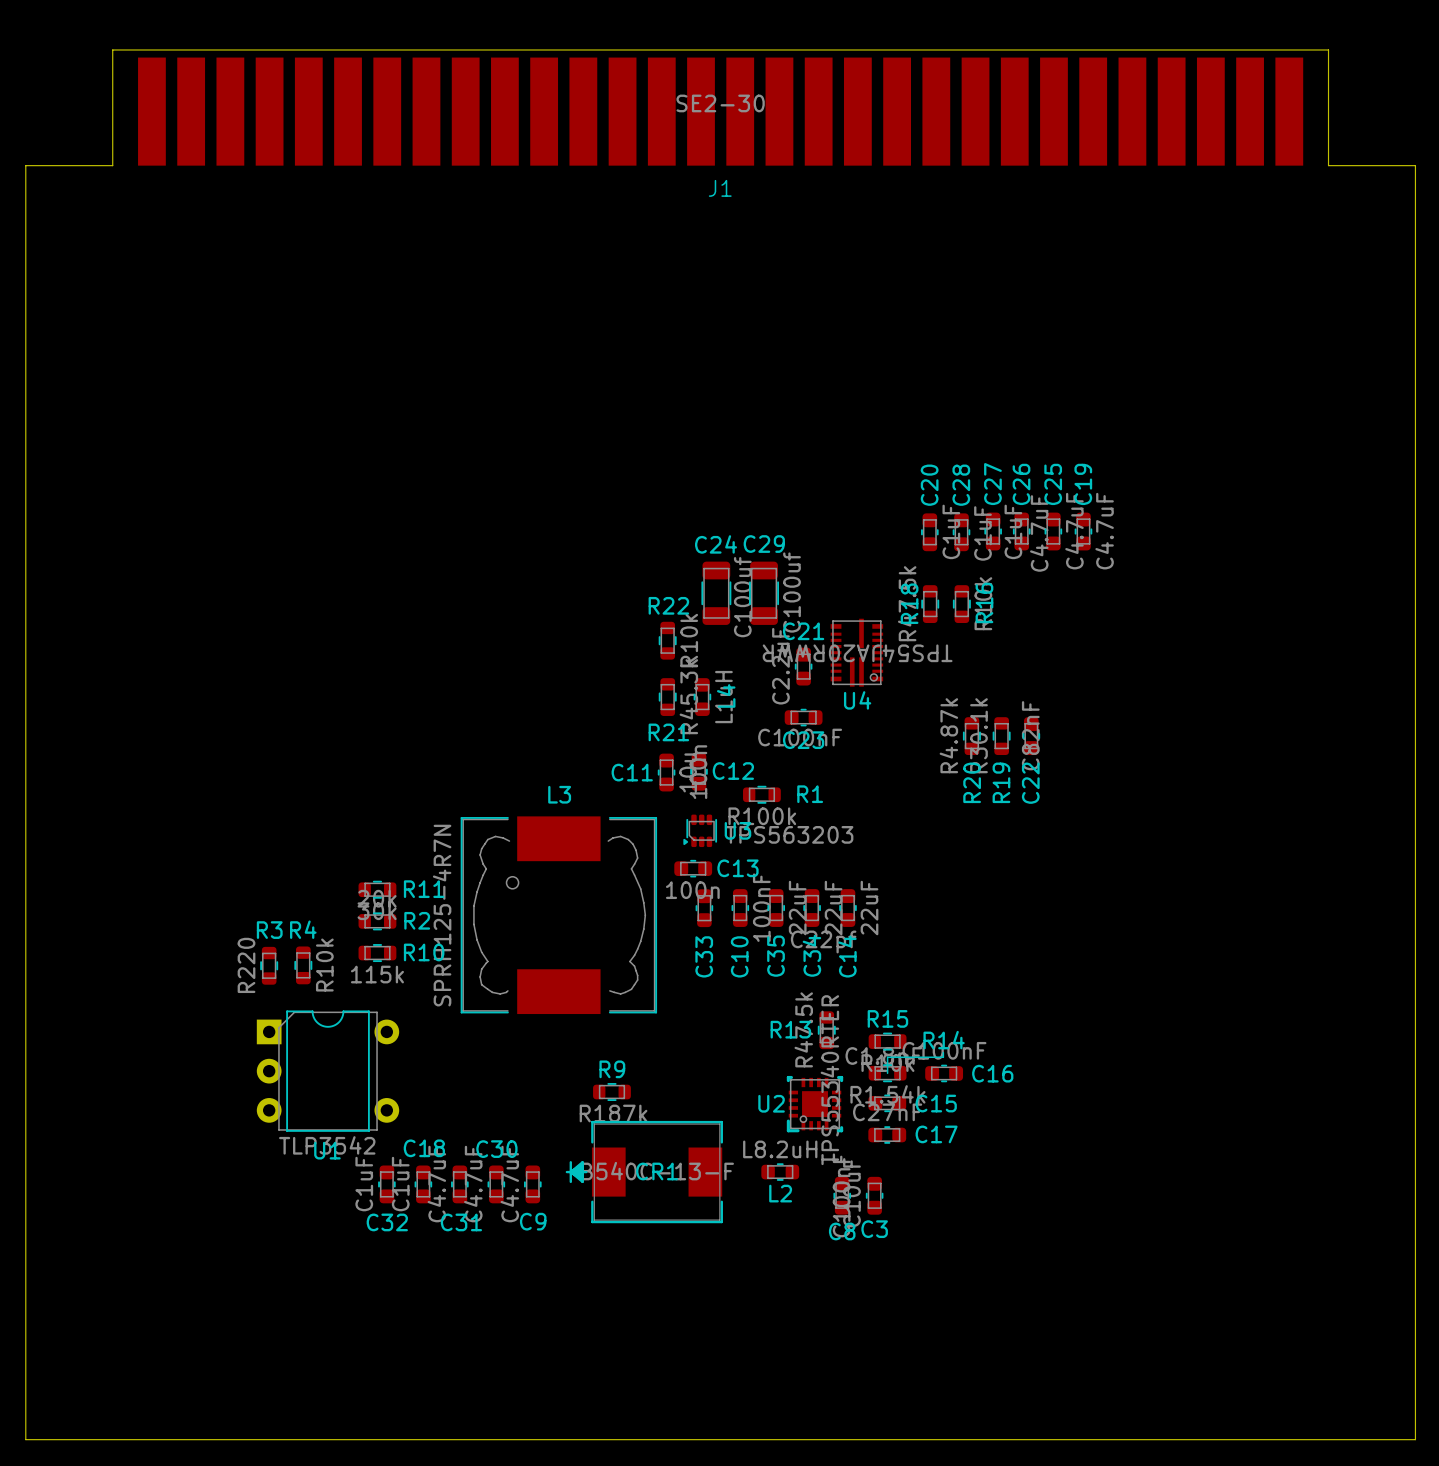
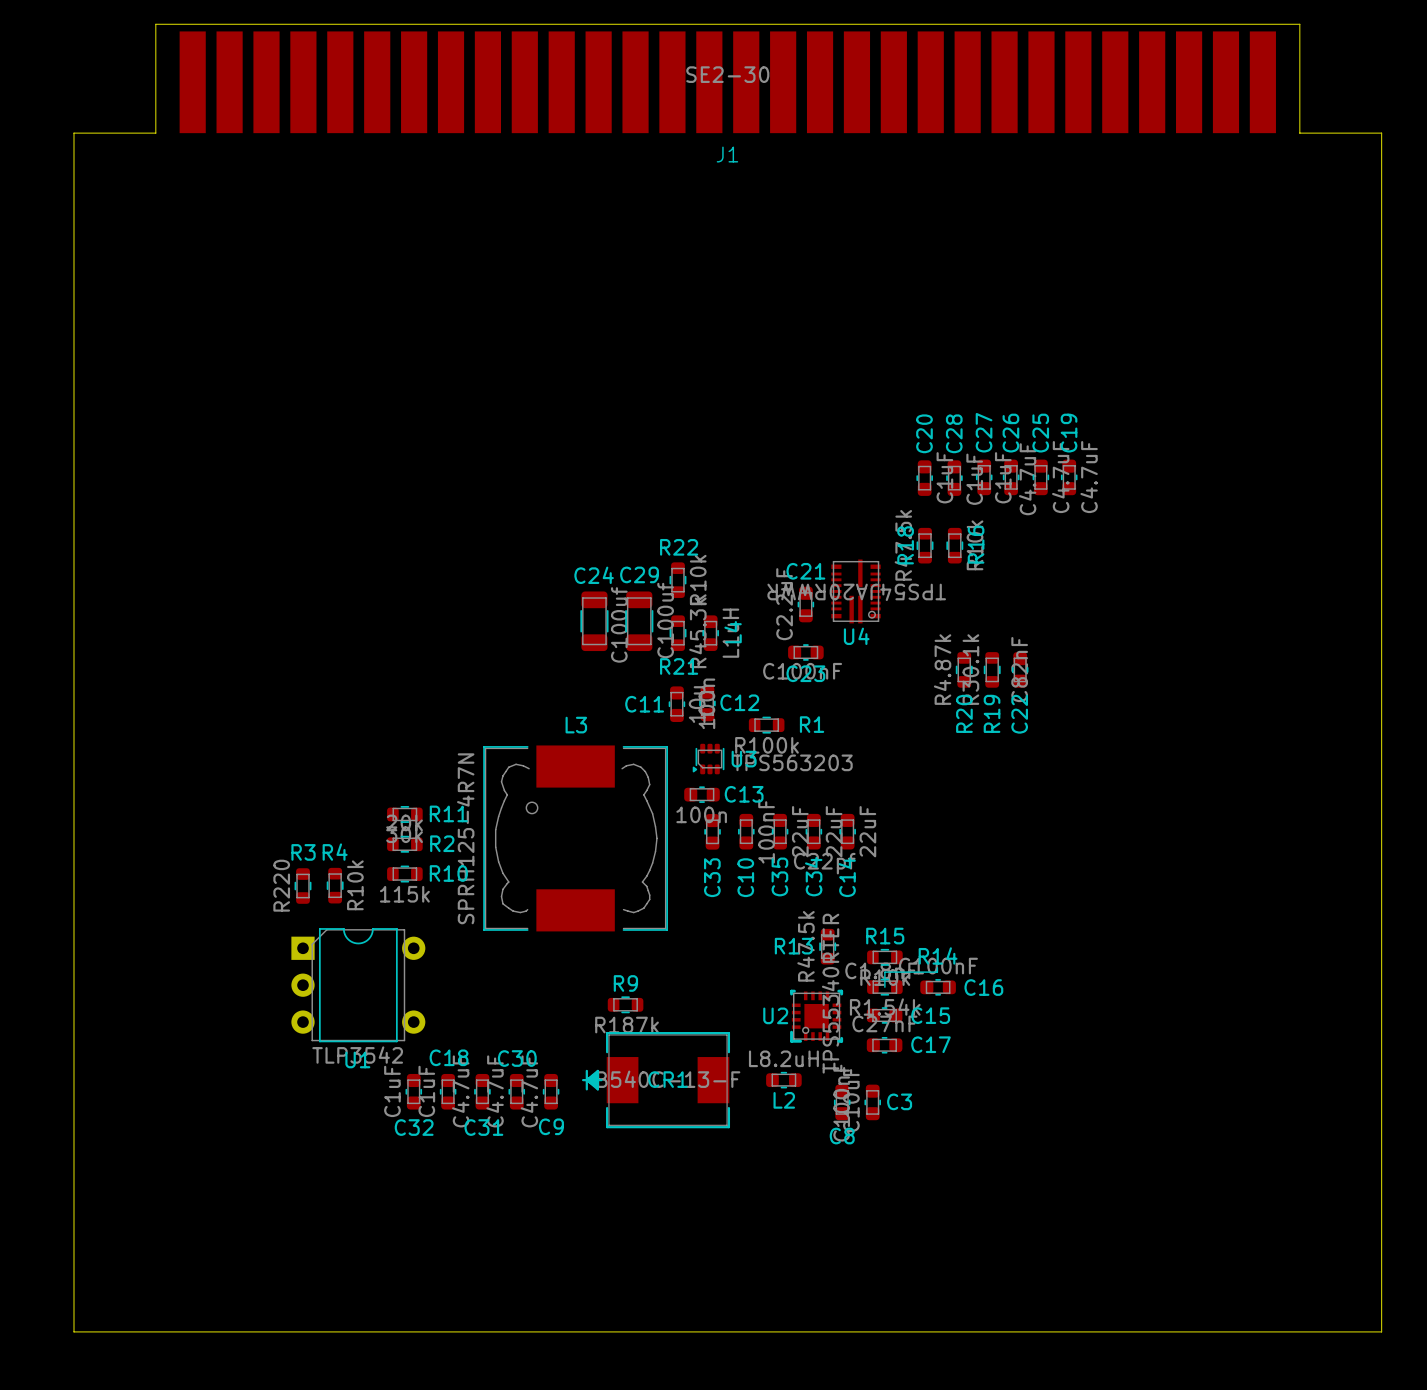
C24 position: (716, 593) -> (594, 621)
C29 position: (764, 593) -> (639, 621)
C3 name position: C3 (874, 1229) -> C3 (899, 1101)

